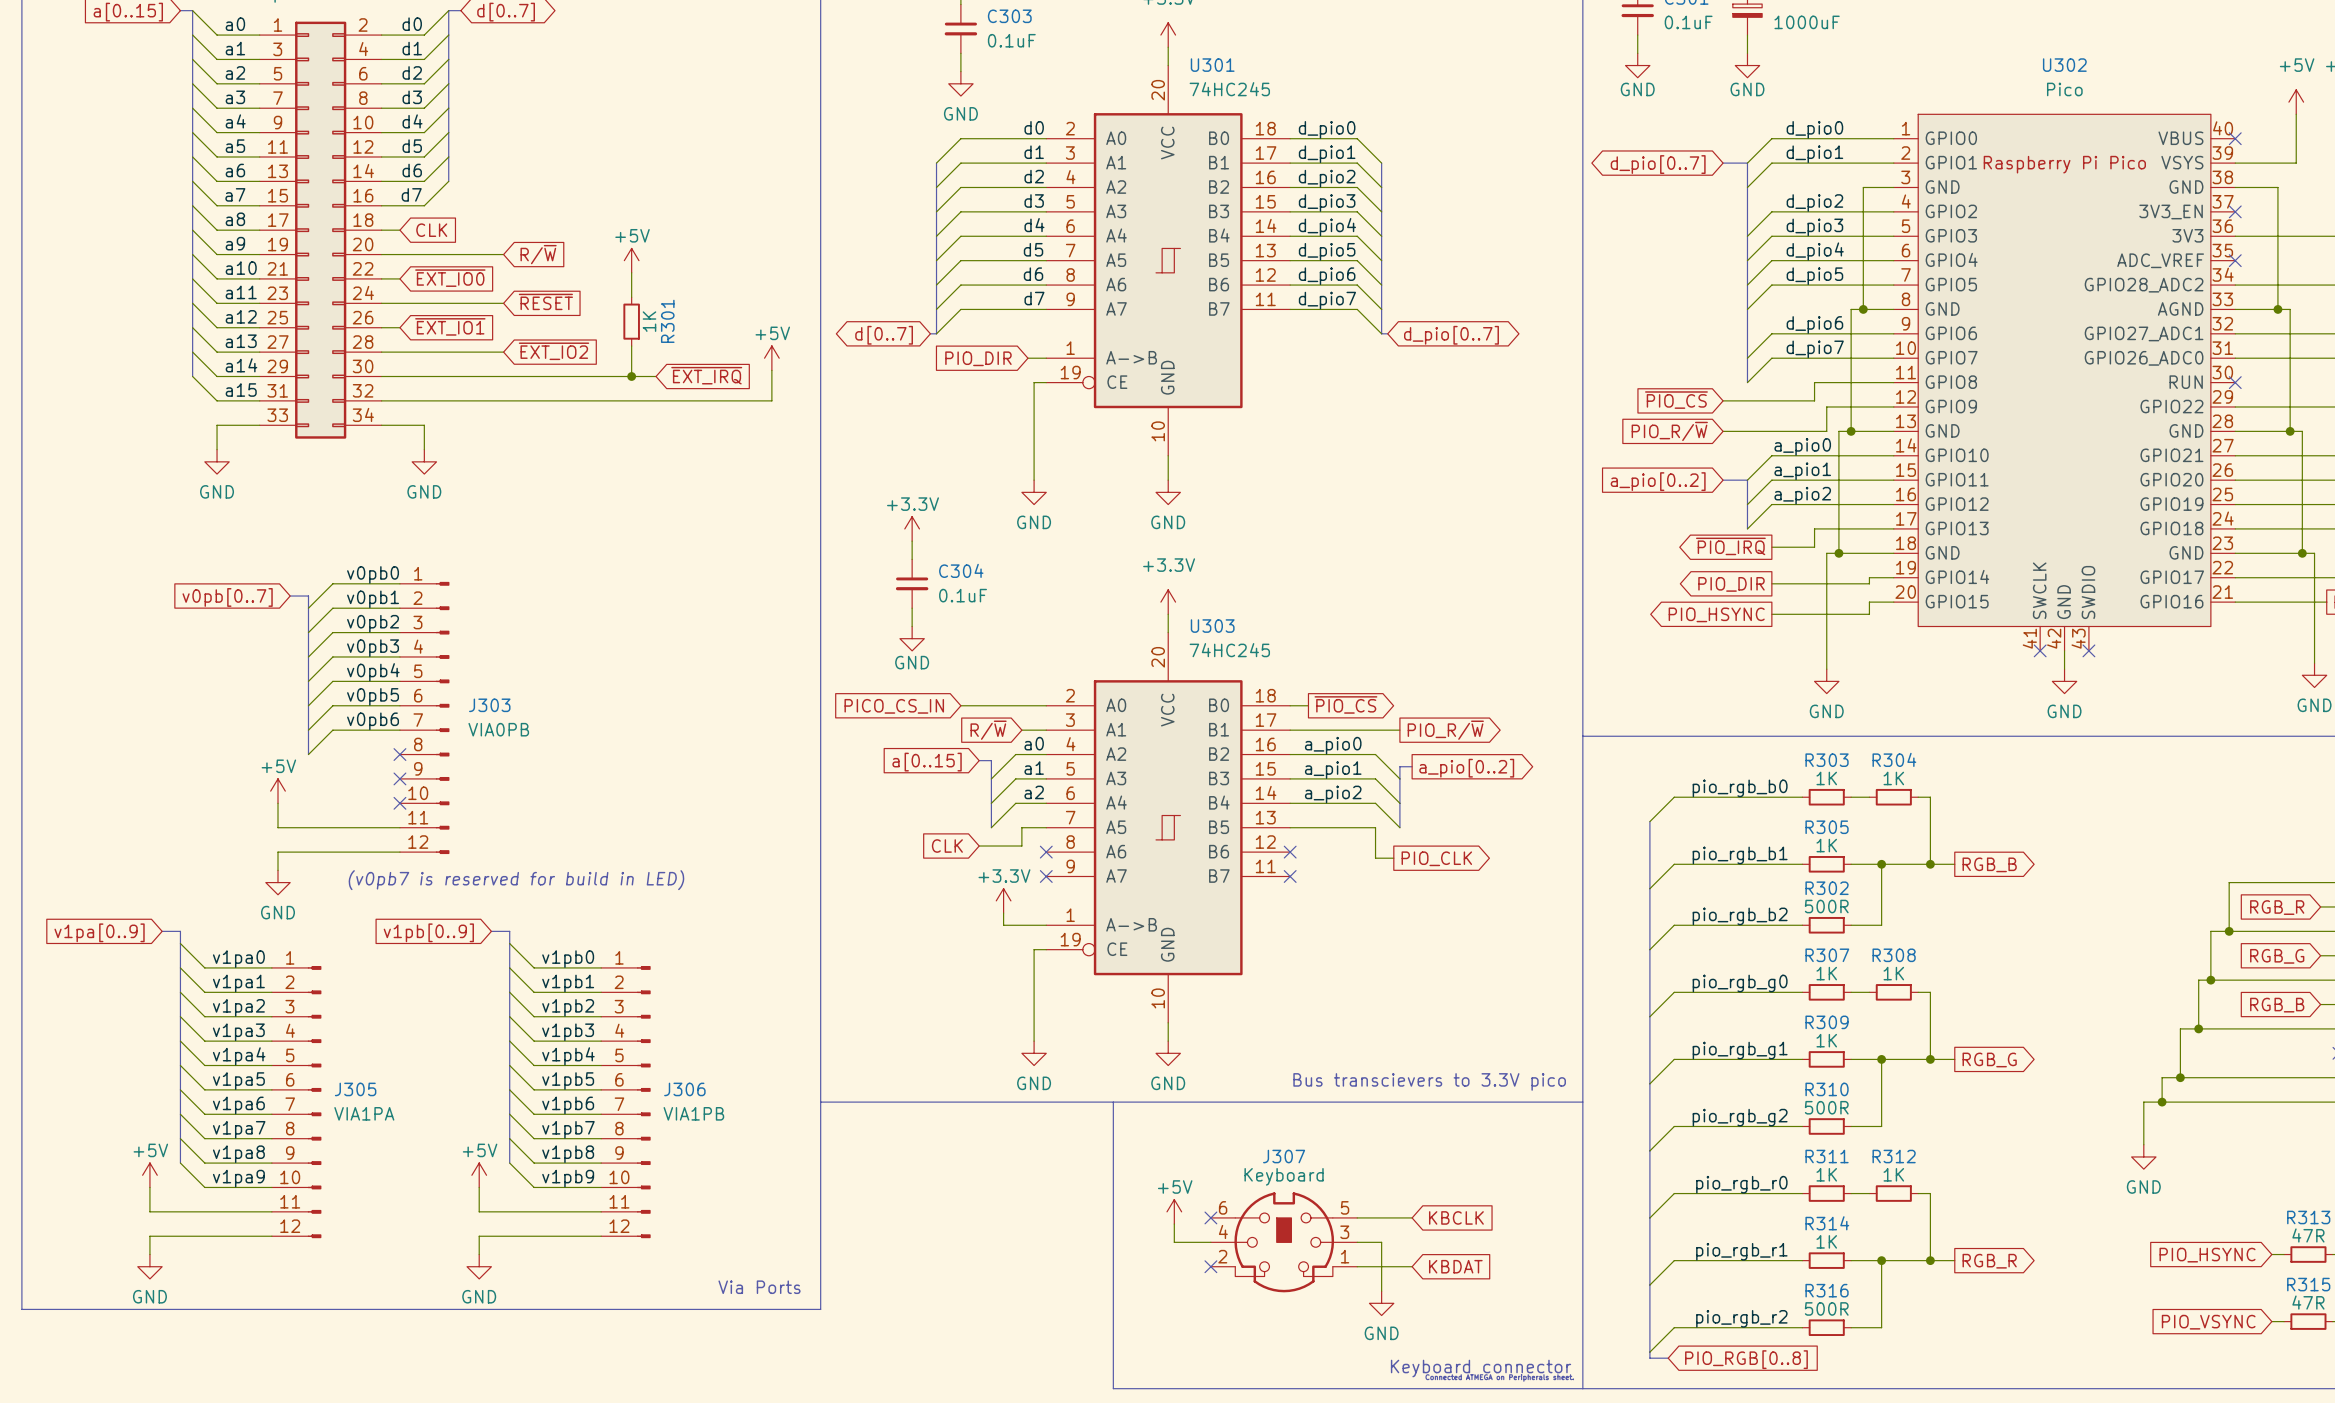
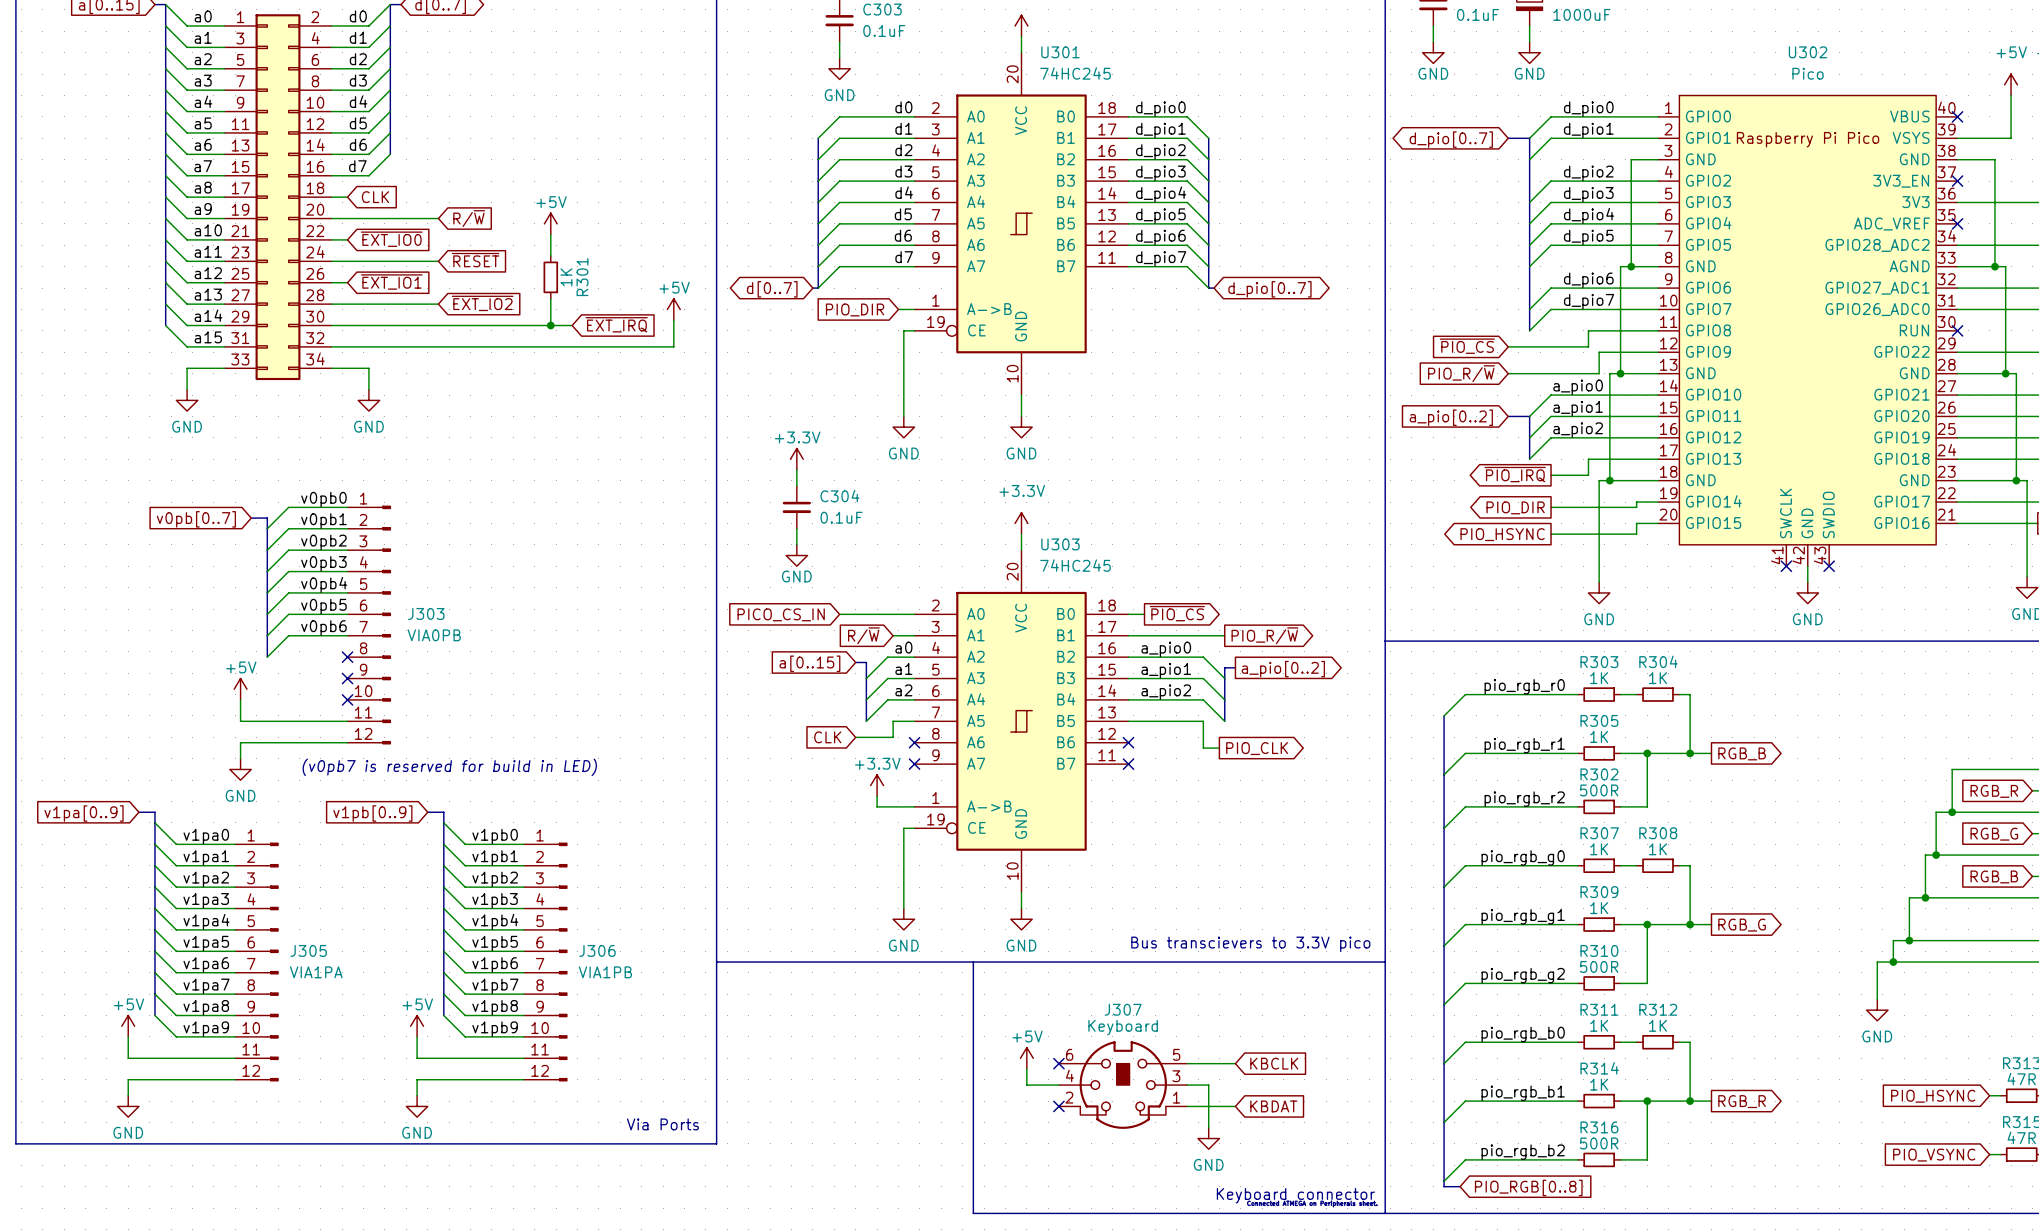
label: pio_rgb_b0 (1740, 788) -> pio_rgb_r0 (1524, 686)
label: pio_rgb_b1 (1740, 855) -> pio_rgb_r1 (1524, 745)
label: pio_rgb_b2 (1740, 916) -> pio_rgb_r2 (1524, 799)
label: pio_rgb_r0 (1741, 1184) -> pio_rgb_b0 (1523, 1034)
label: pio_rgb_r1 (1741, 1251) -> pio_rgb_b1 (1523, 1093)
label: pio_rgb_r2 (1741, 1318) -> pio_rgb_b2 (1523, 1152)

